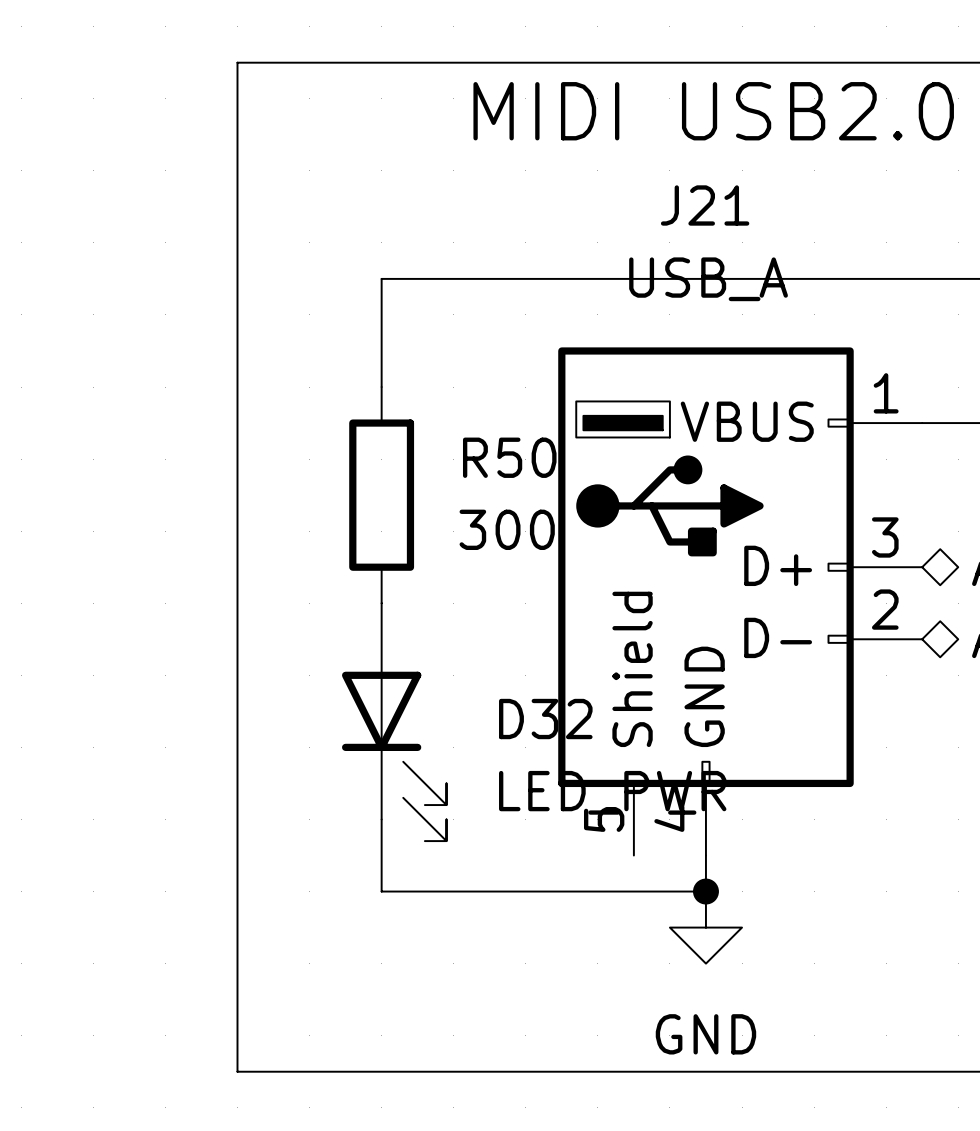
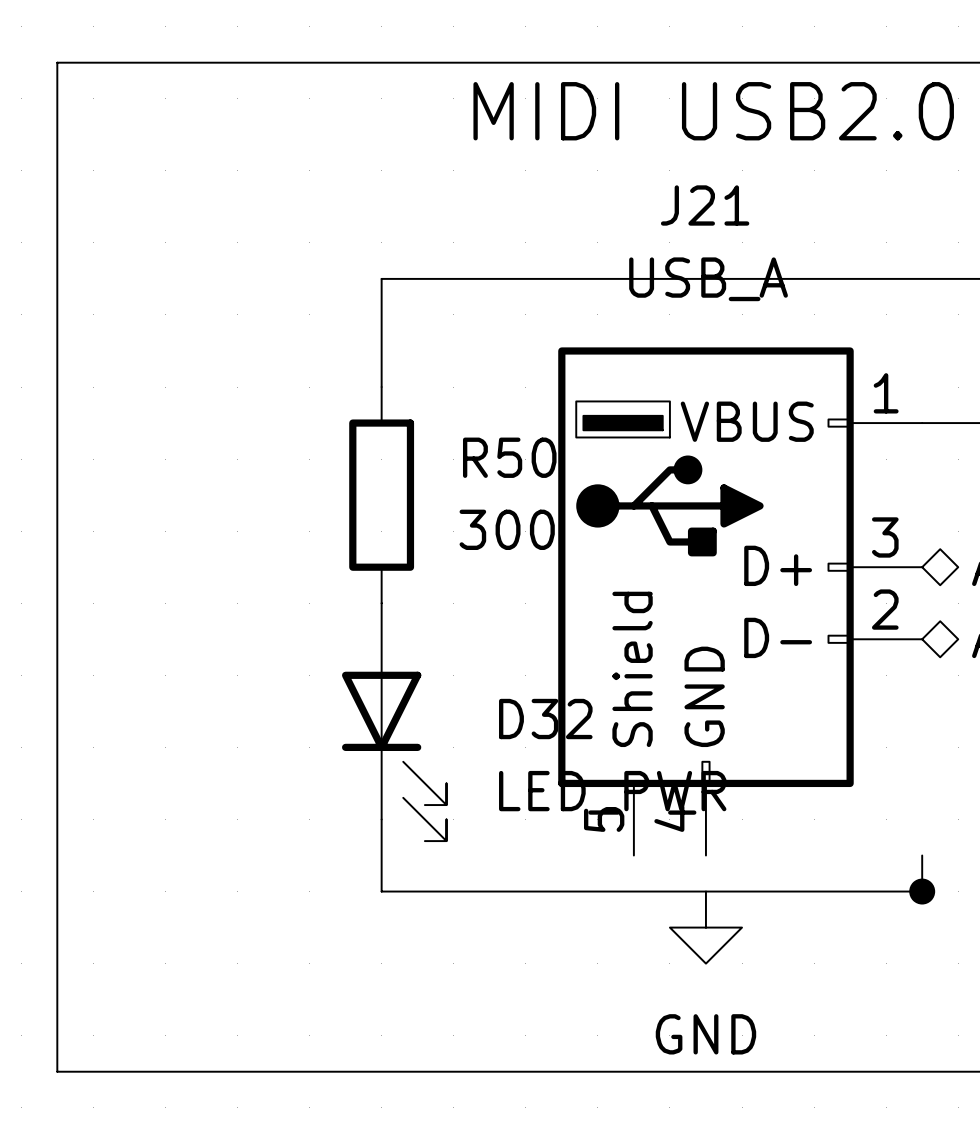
line: (237, 62) (237, 1071) -> (237, 62) (57, 62) (57, 1071) (237, 1071)
wire: (705, 855) (705, 891) -> (922, 855) (922, 891) (705, 891)
junction: (705, 891) -> none
junction: none -> (922, 891)

